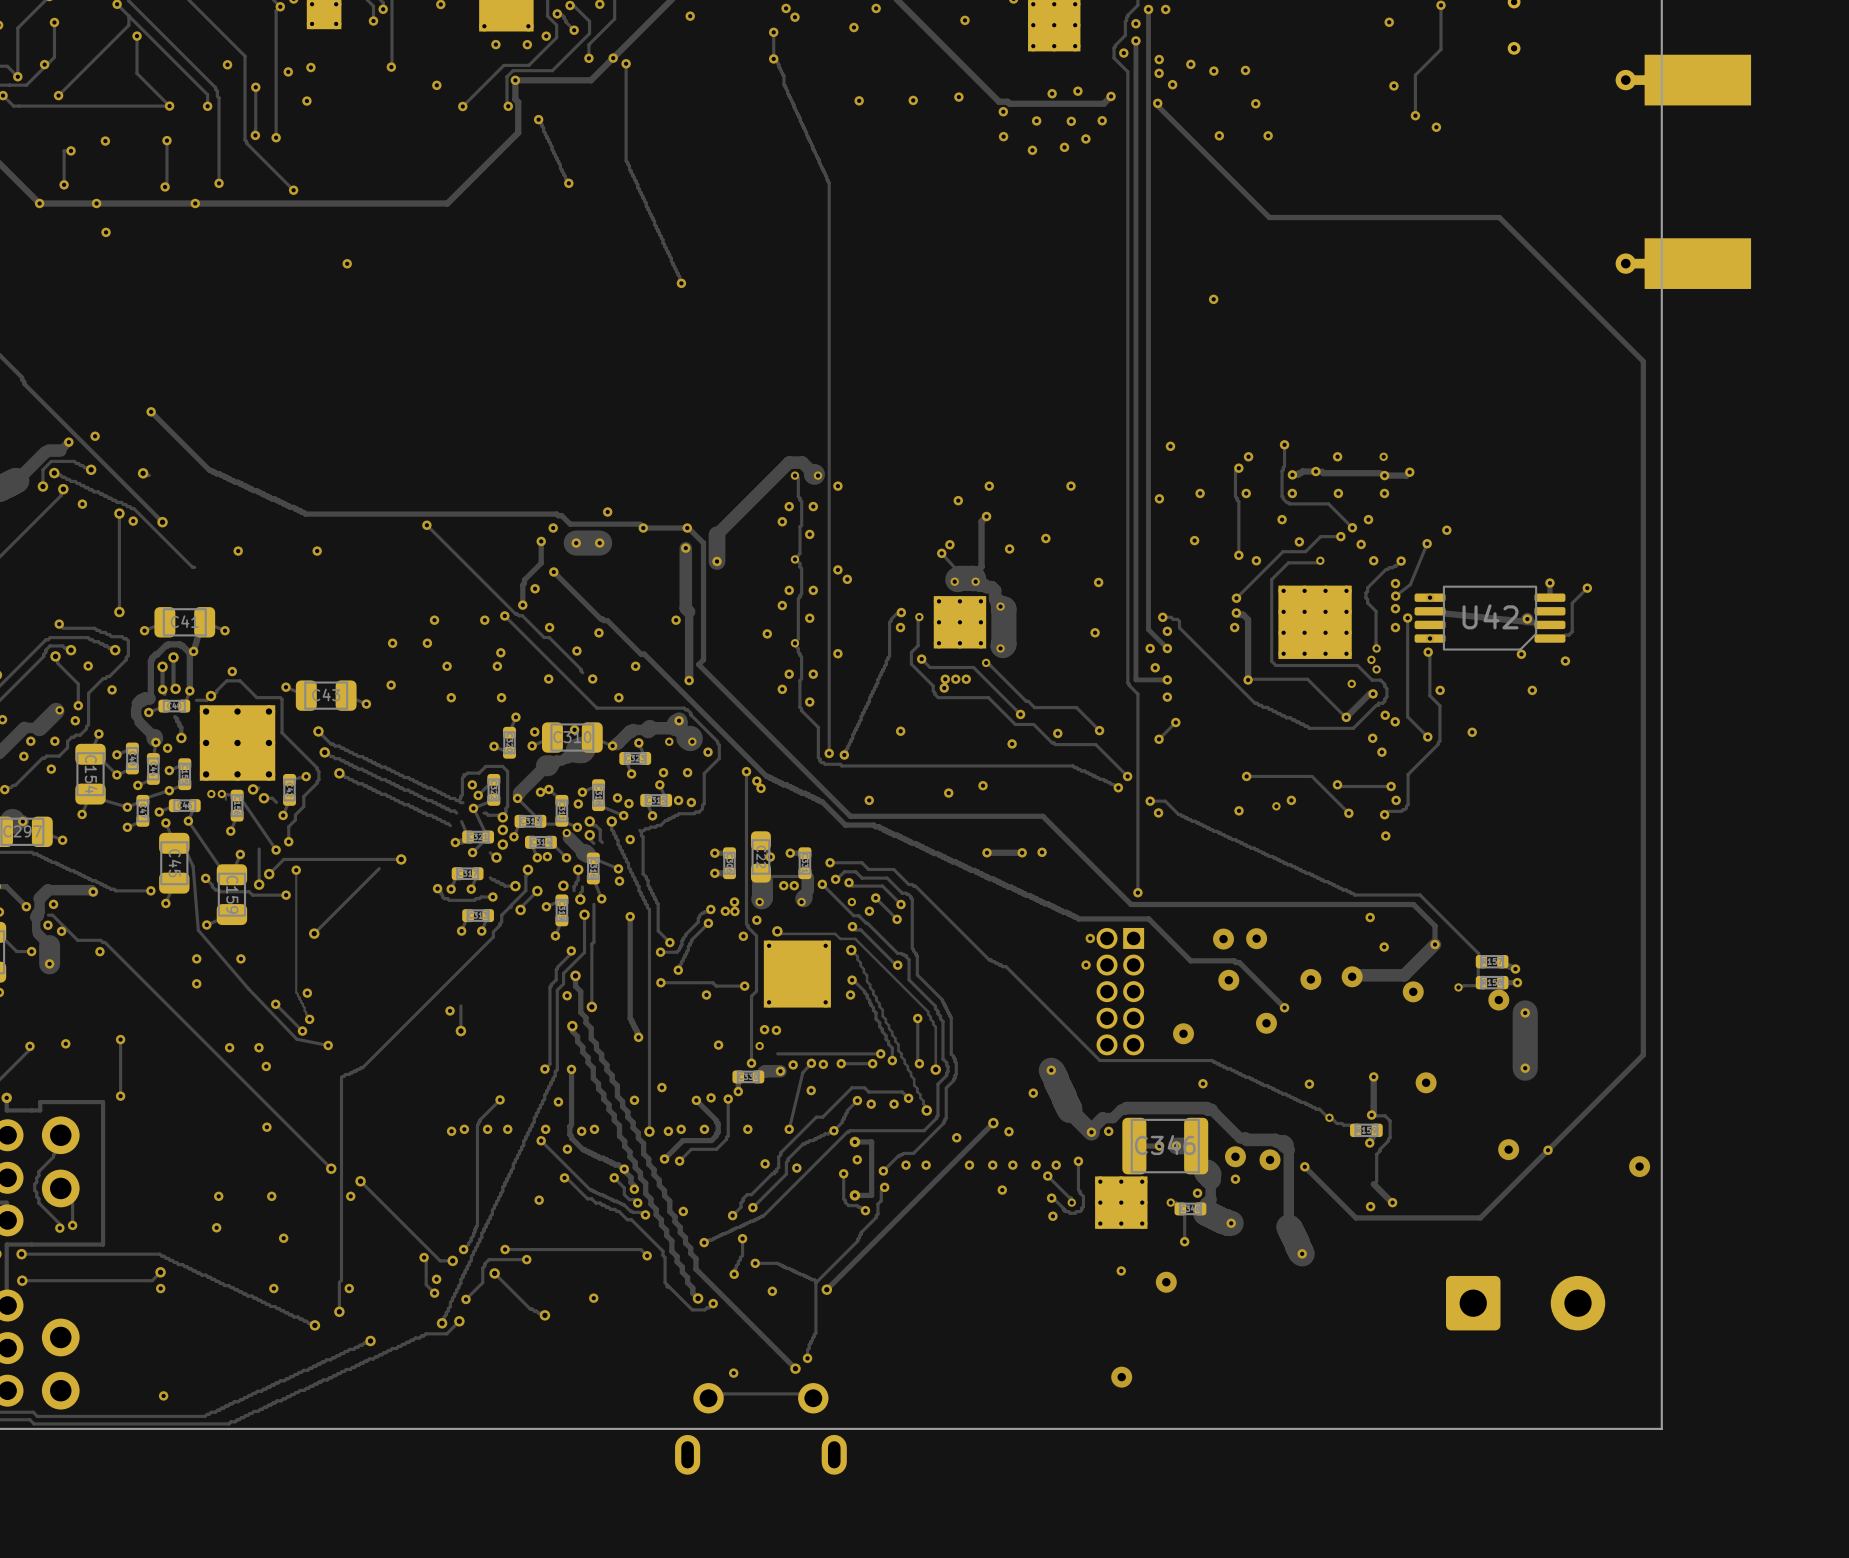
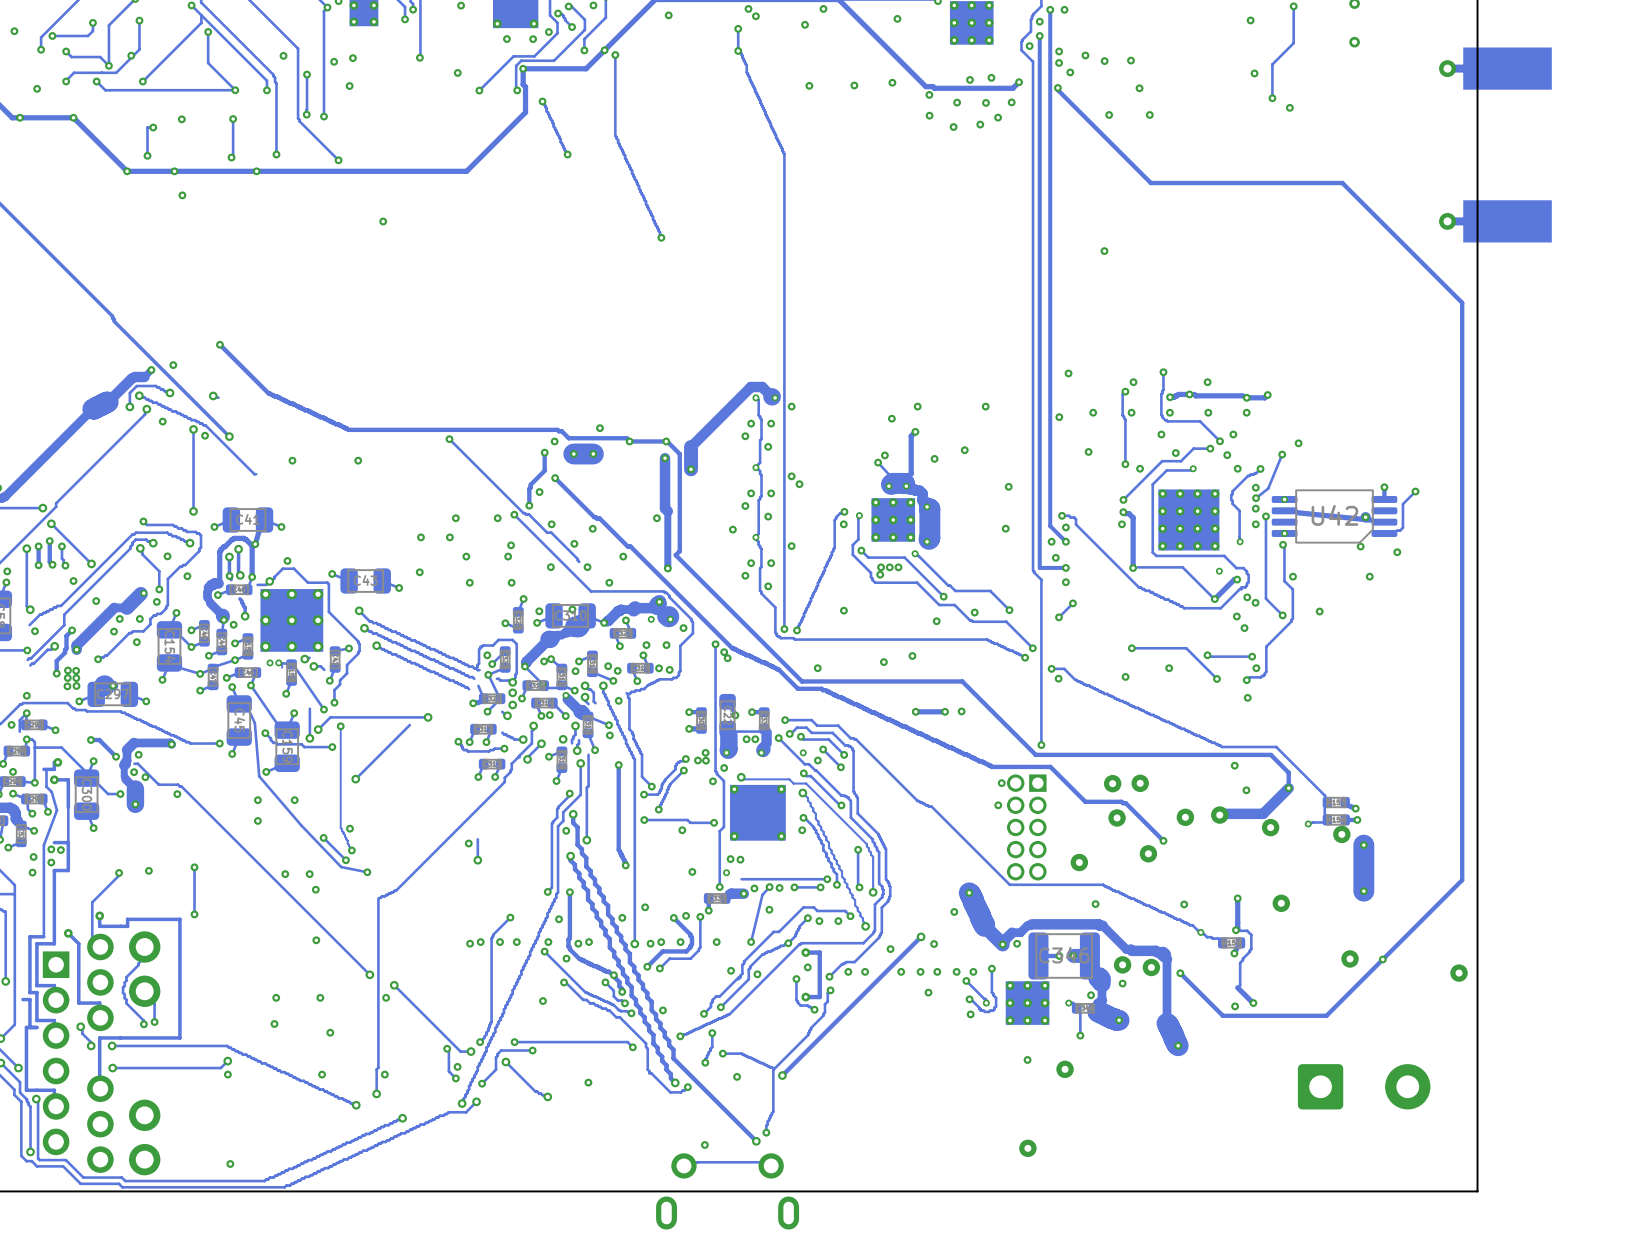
via: (1383, 456) -> none
via: (1371, 659) -> none
via: (1376, 669) -> none
via: (1276, 806) -> none

